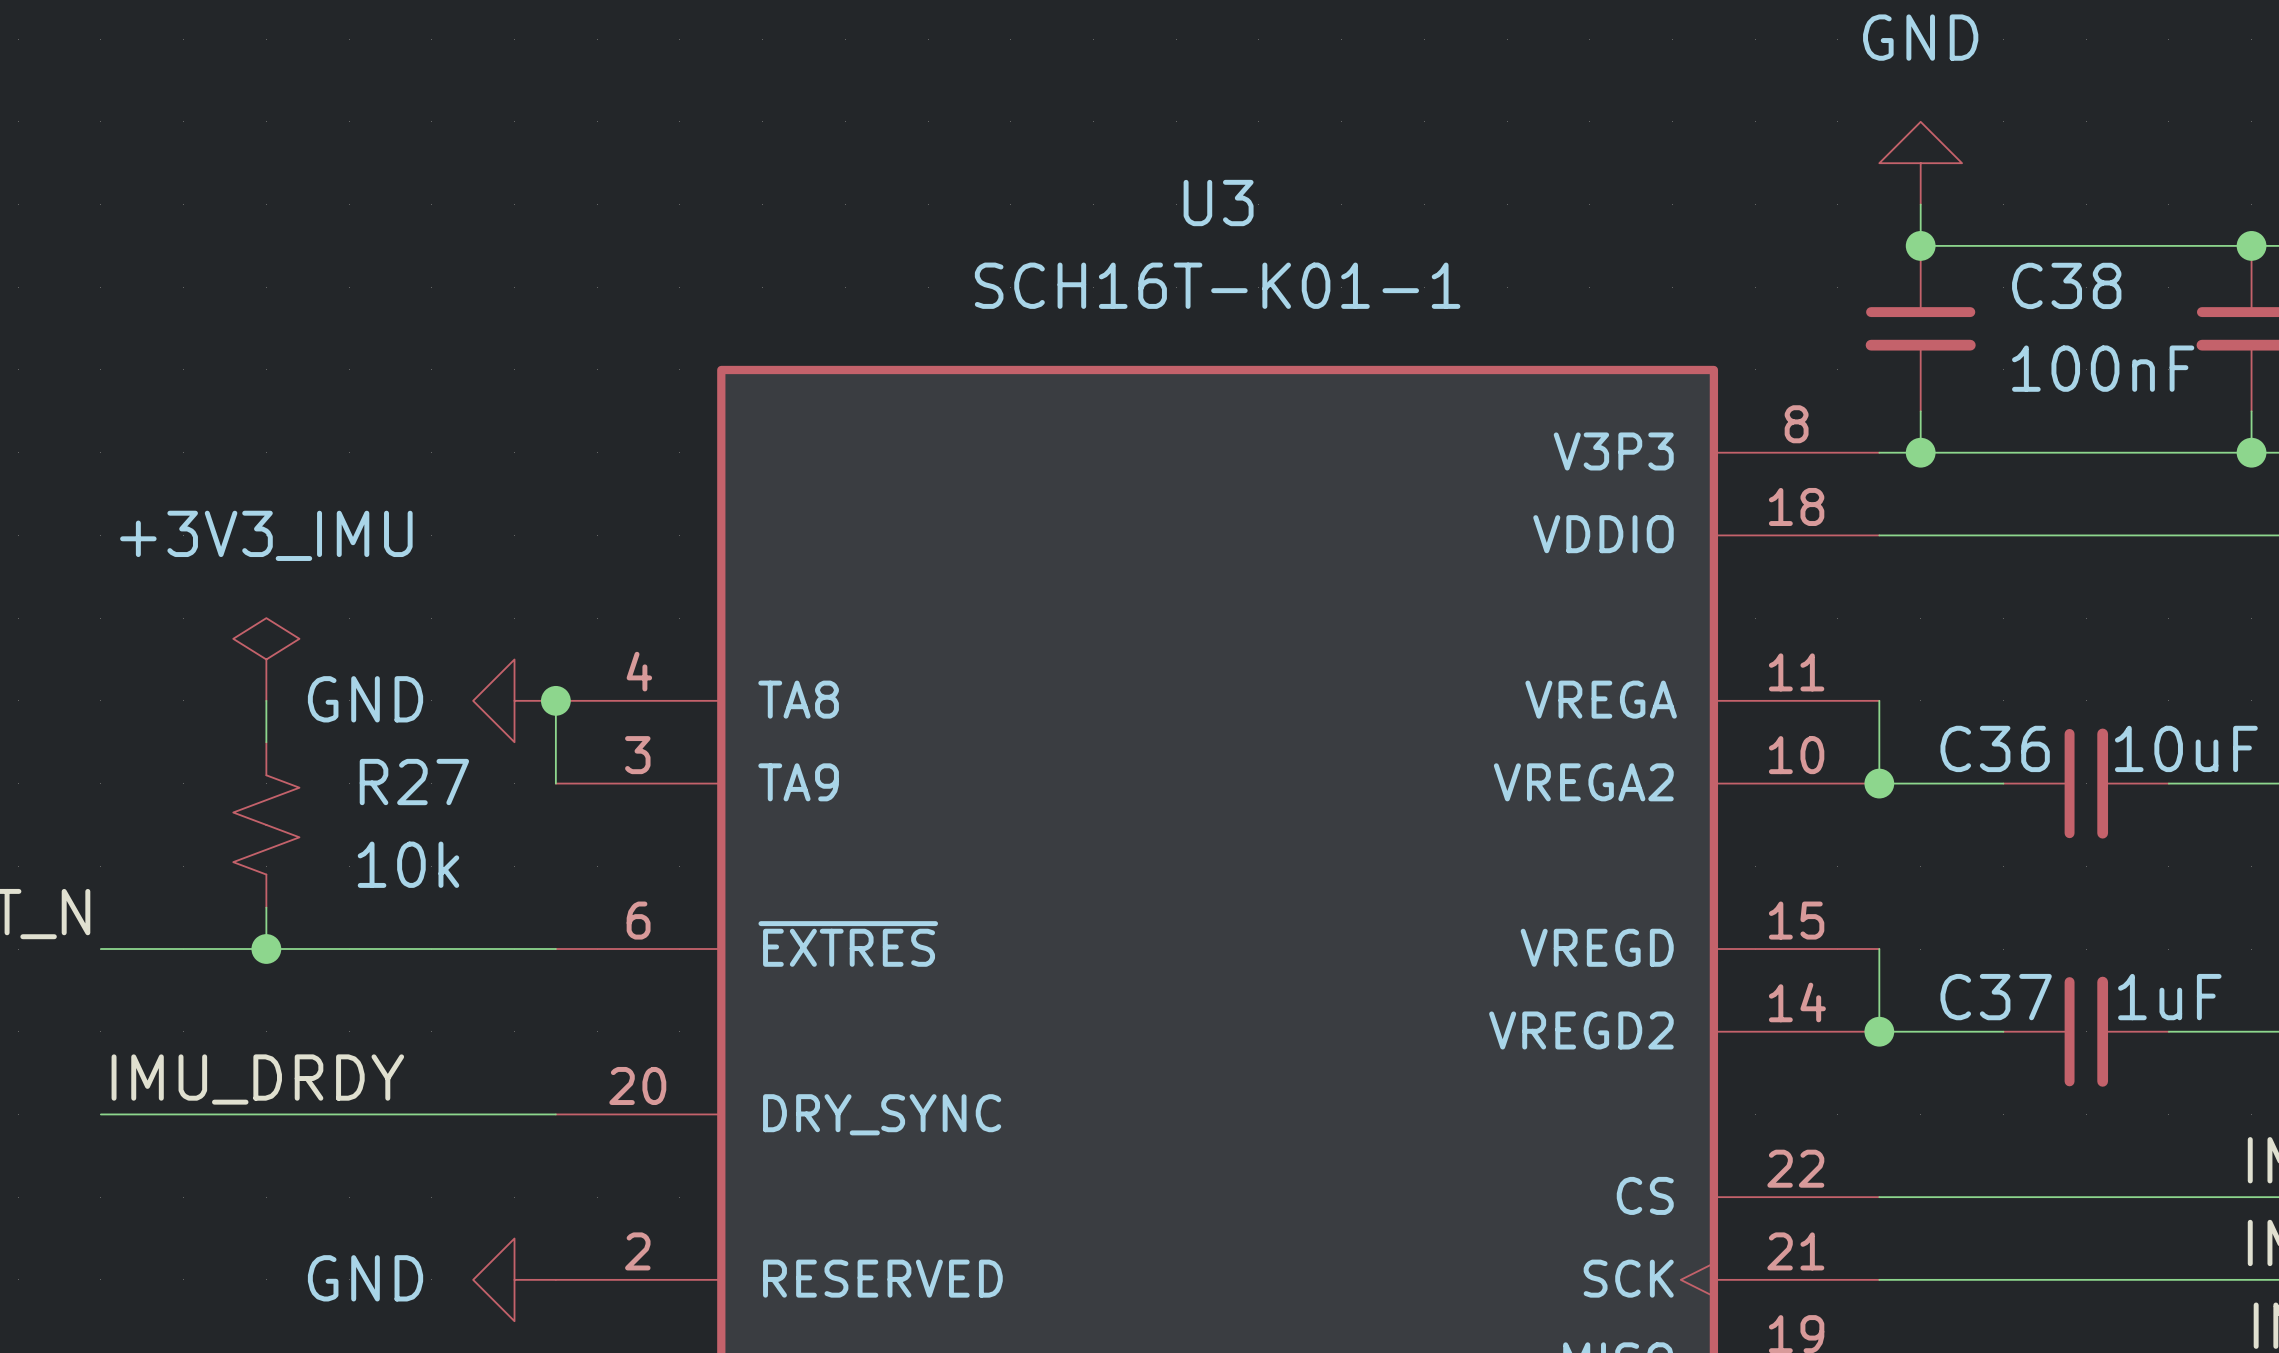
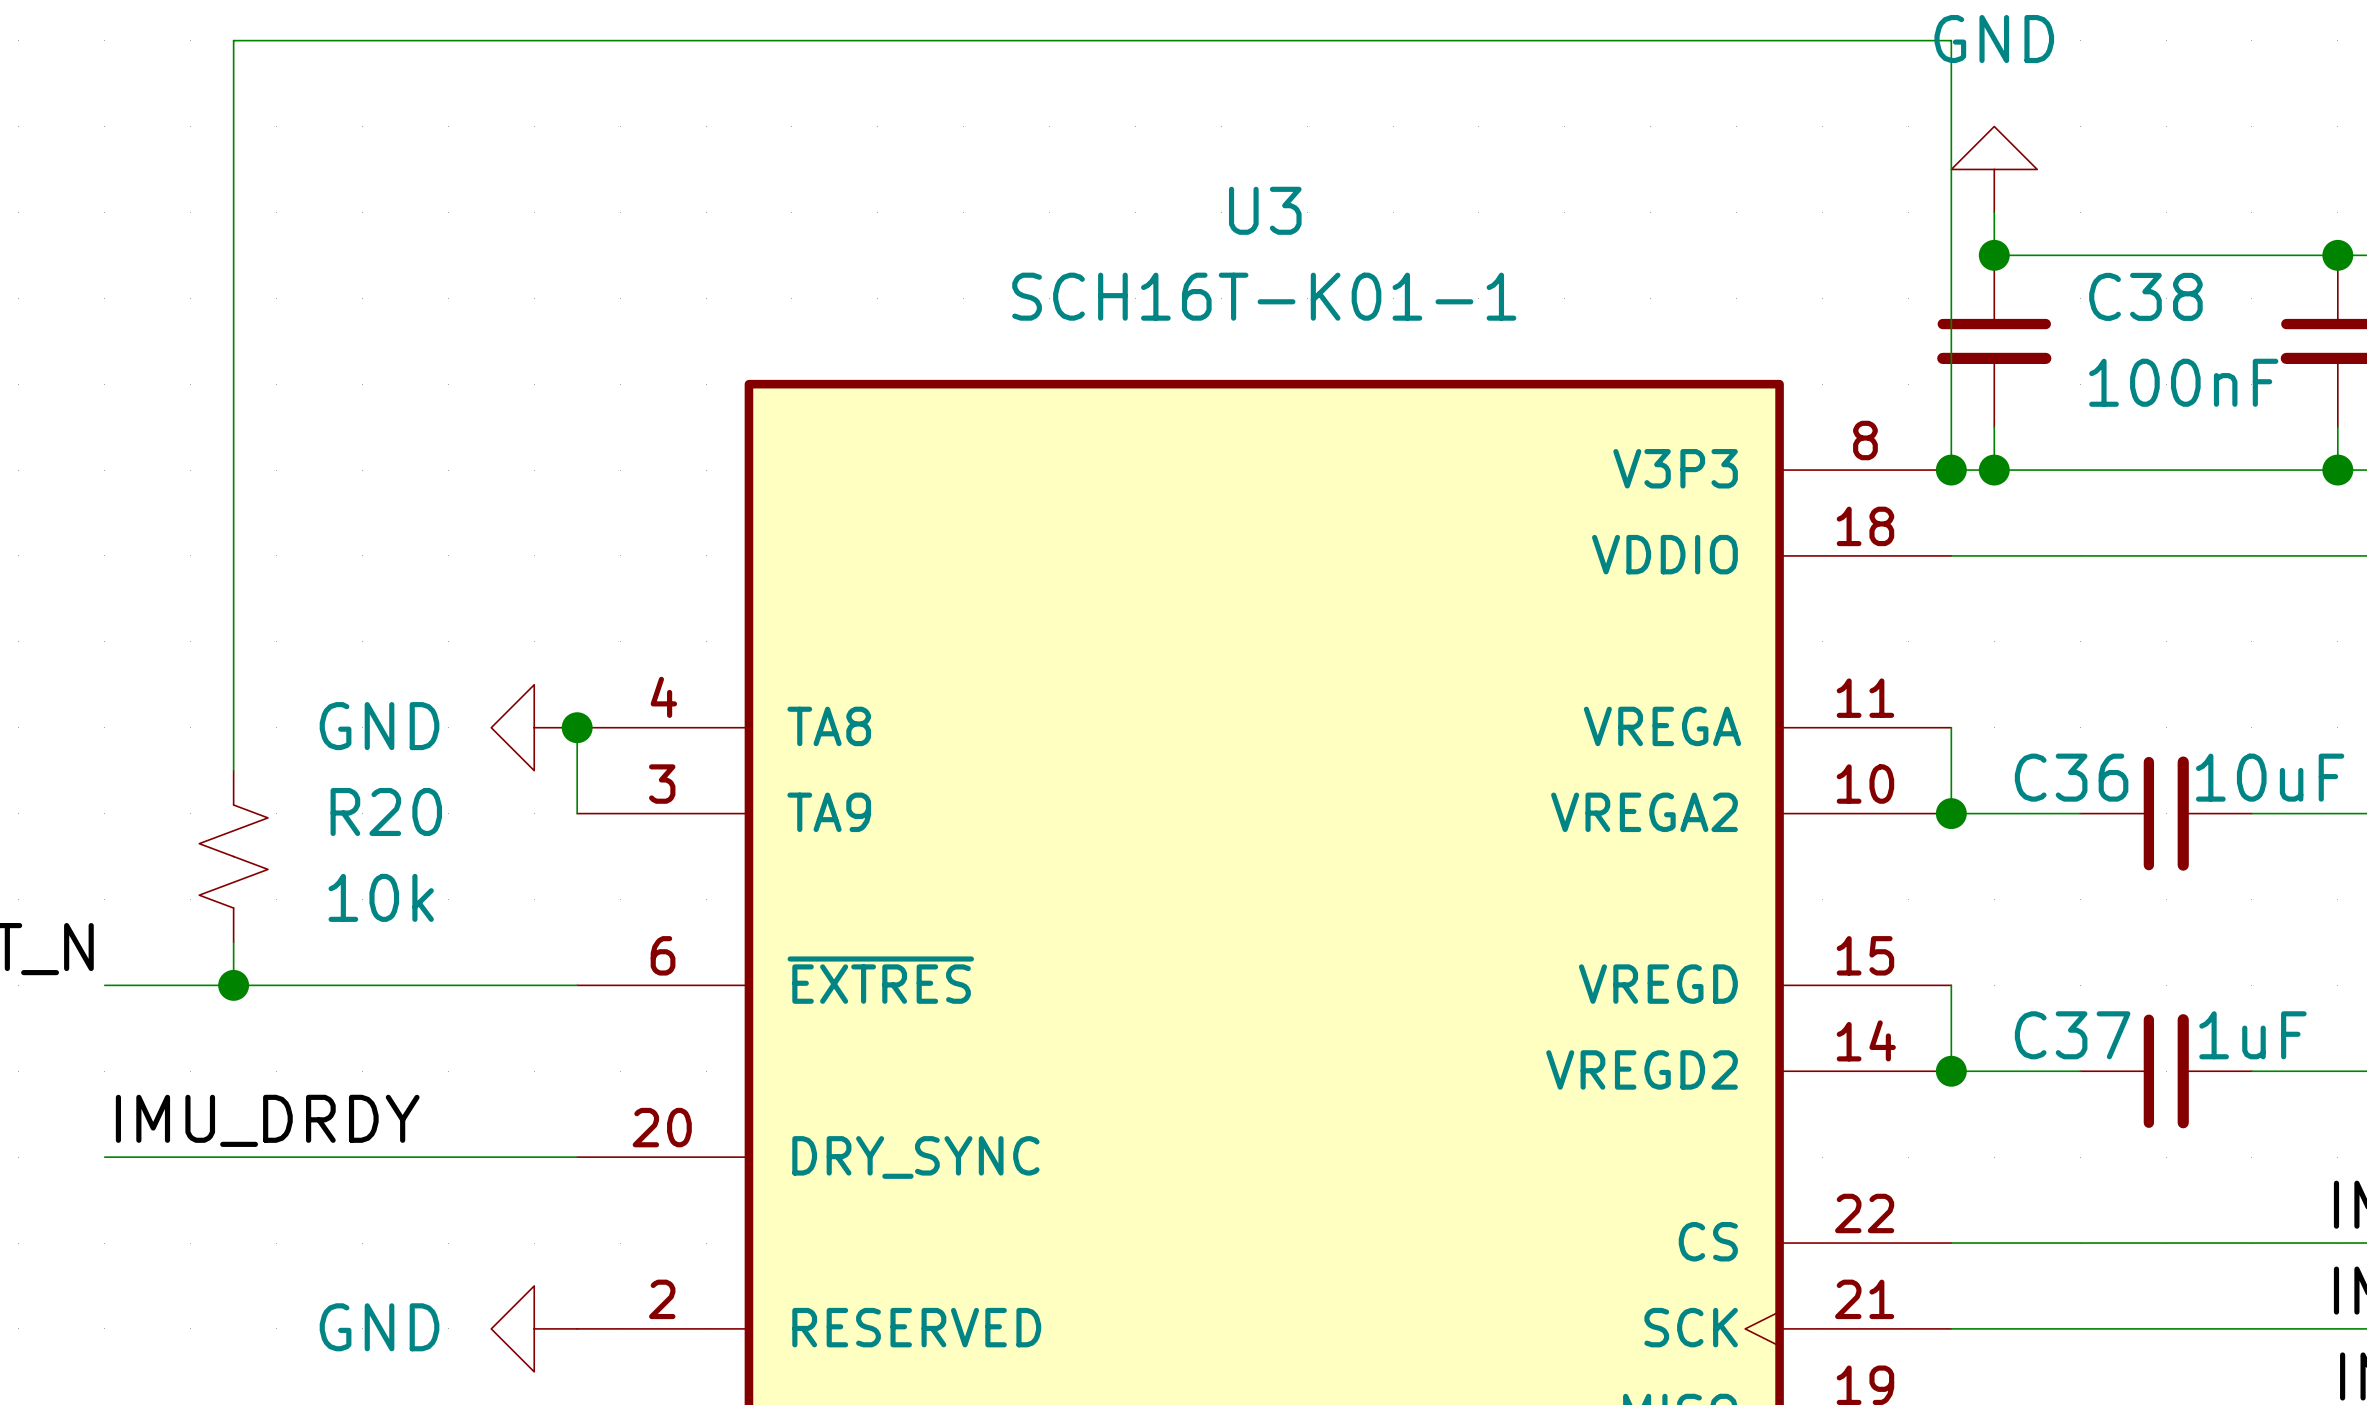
wire: none -> (1951, 470) (1951, 40) (233, 40) (233, 770)
junction: none -> (1951, 470)
power symbol: +3V3_IMU (266, 659) -> none
wire: (266, 700) (266, 742) -> none
R20: none -> 10k (233, 856)
R27: 10k (266, 824) -> none
wire: (266, 907) (266, 949) -> (233, 942) (233, 985)
junction position: (266, 949) -> (233, 985)

